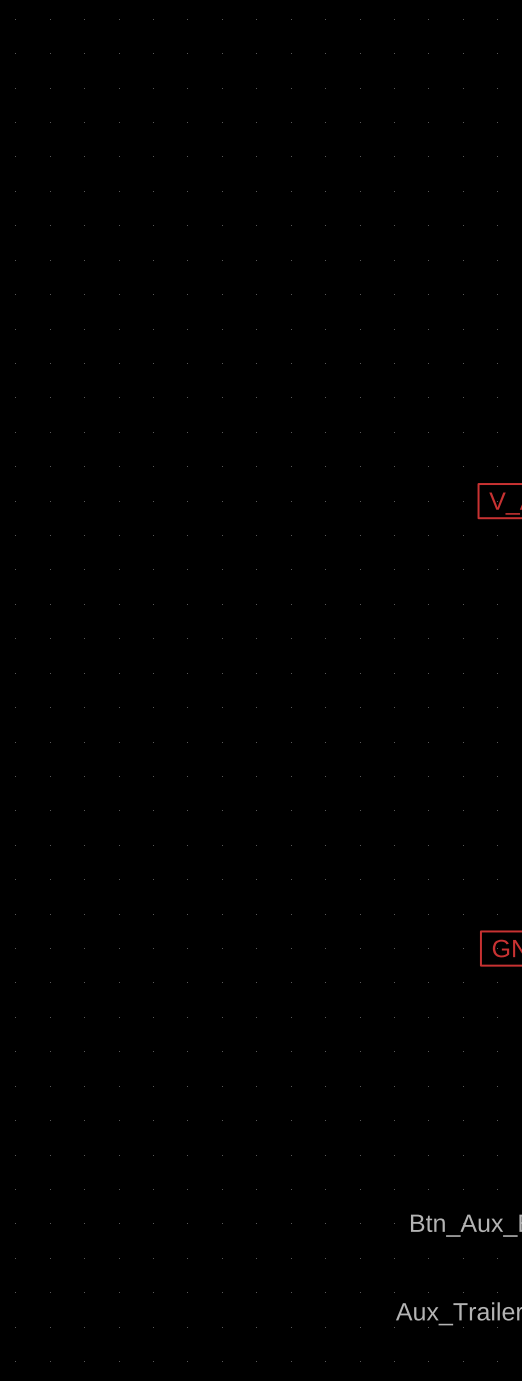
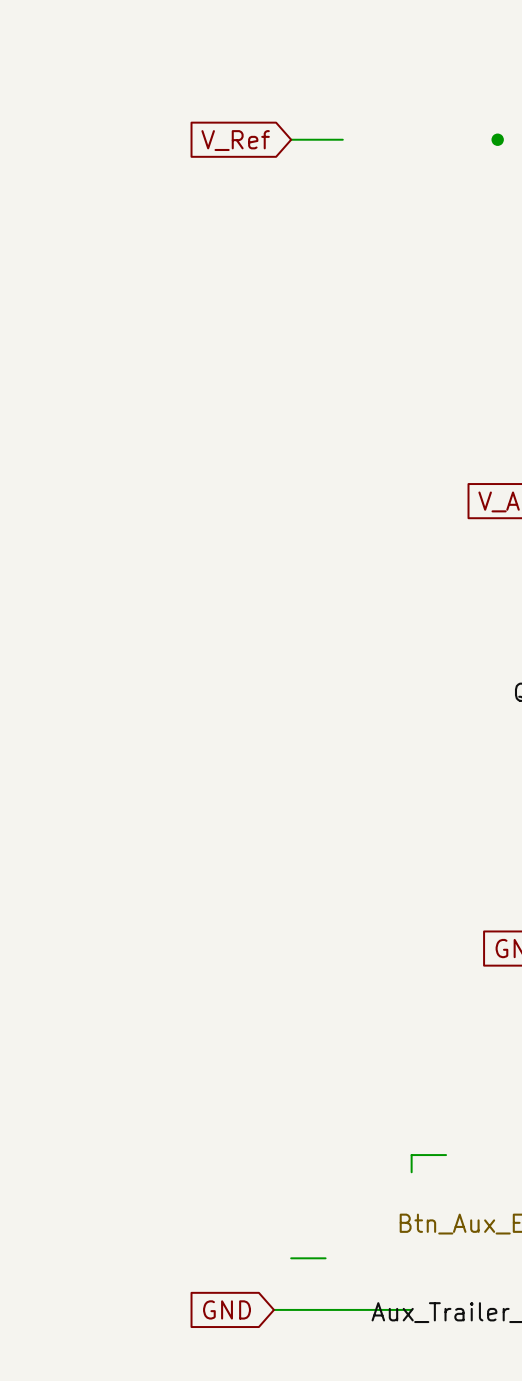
wire: none -> (291, 139) (342, 139)
junction: none -> (497, 139)
global label: none -> V_Ref (235, 140)
wire: none -> (446, 1155) (411, 1155) (411, 1172)
wire: none -> (291, 1258) (325, 1258)
global label: none -> GND (227, 1309)
wire: none -> (273, 1309) (411, 1309)

